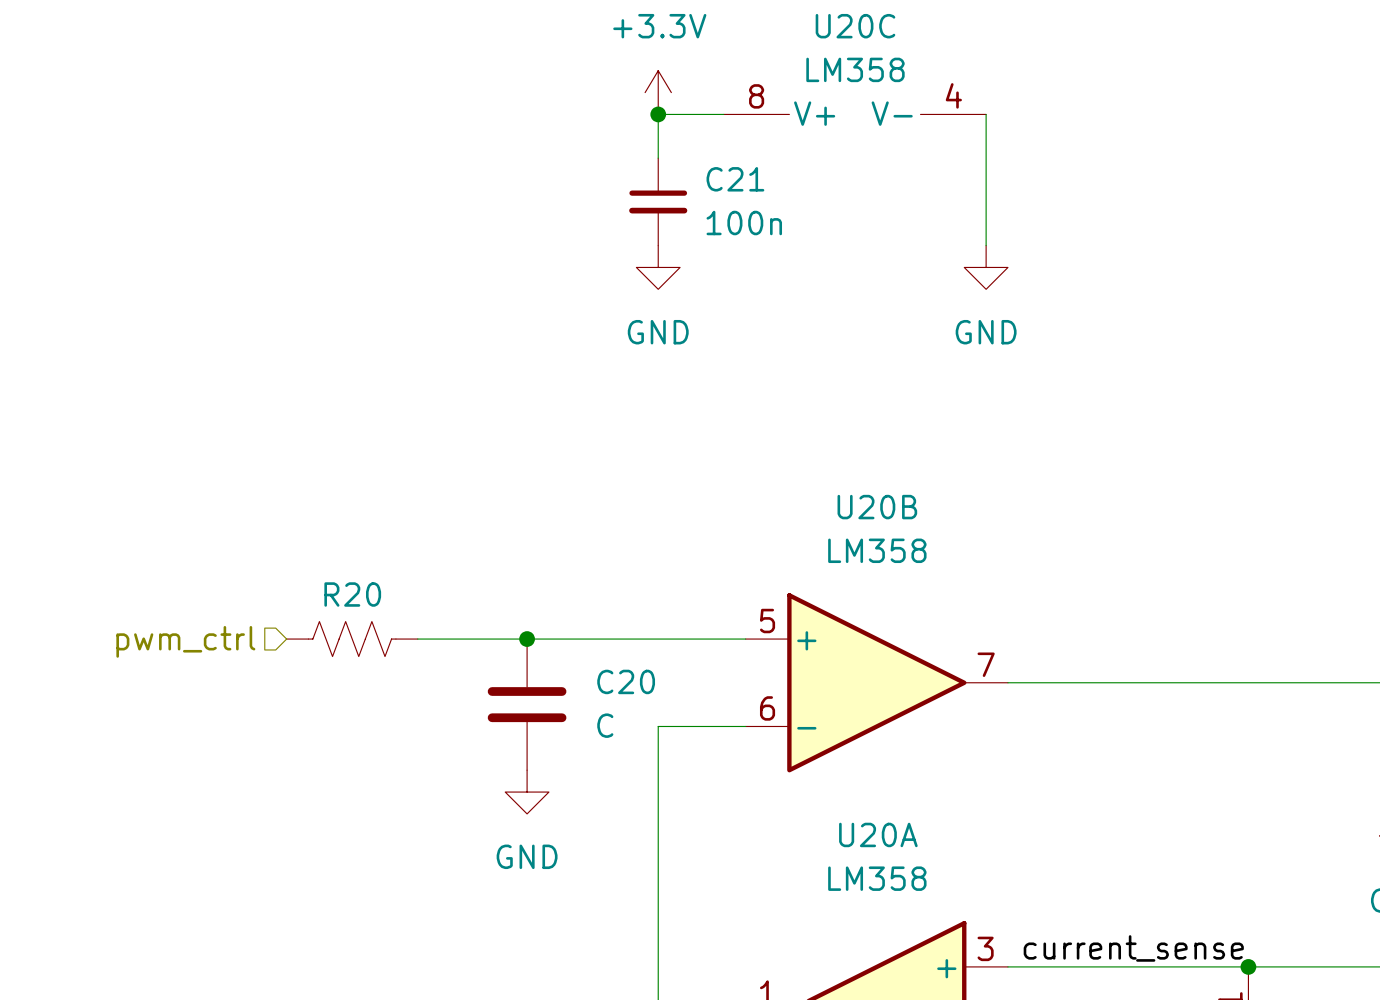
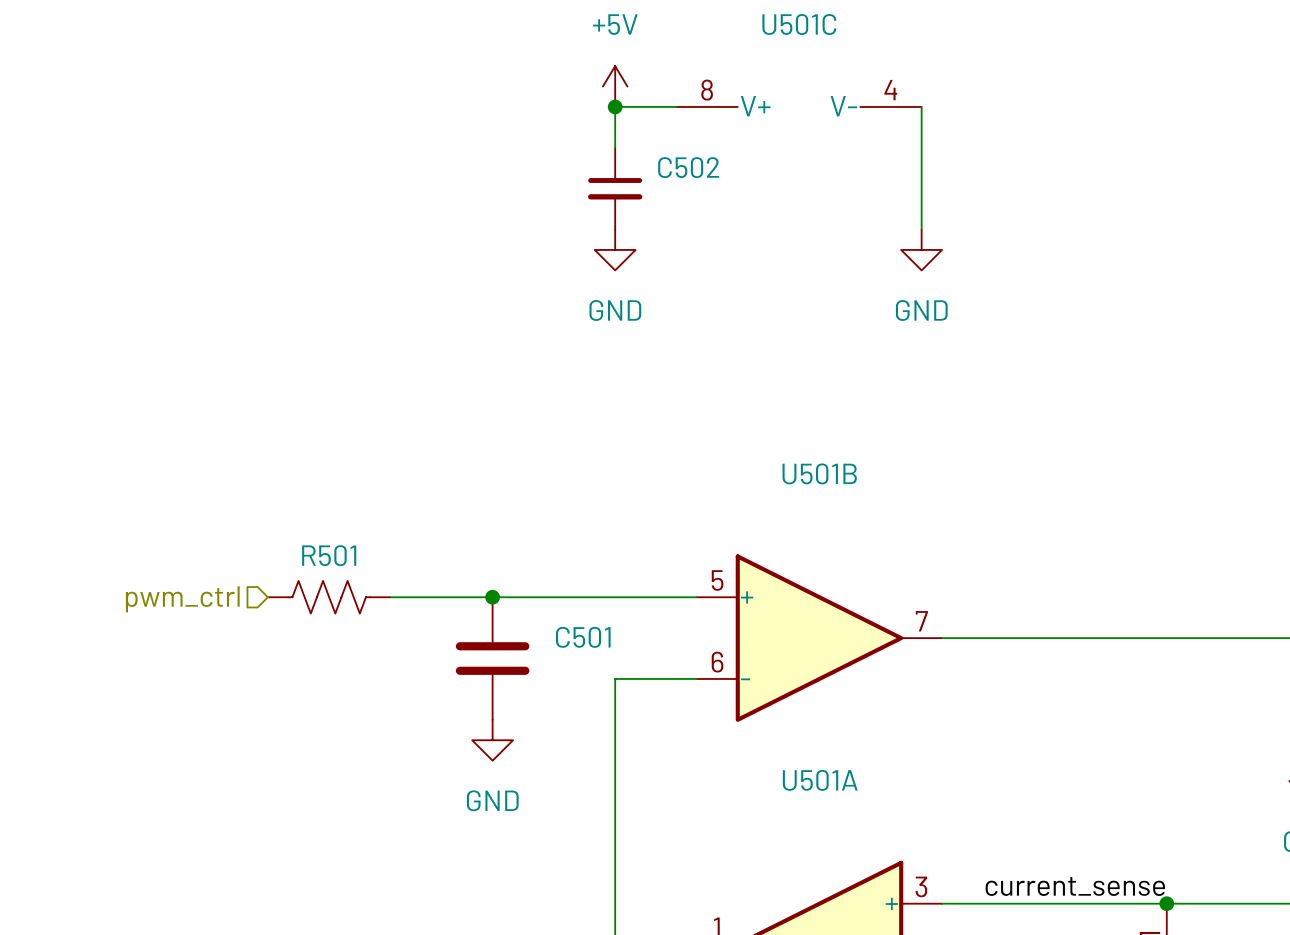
U20C name: U20C (855, 26) -> U501C (799, 24)
U20C value: LM358 (855, 69) -> none
power symbol: +3.3V (658, 92) -> +5V (615, 86)
C21 name: C21 (735, 179) -> C502 (688, 167)
C21 value: 100n (744, 223) -> none
U20B name: U20B (877, 507) -> U501B (819, 473)
U20B value: LM358 (877, 550) -> none
R20 name: R20 (352, 594) -> R501 (329, 555)
C20 name: C20 (626, 681) -> C501 (583, 637)
C20 value: C (605, 725) -> none
U20A name: U20A (878, 834) -> U501A (820, 780)
U20A value: LM358 (877, 878) -> none

